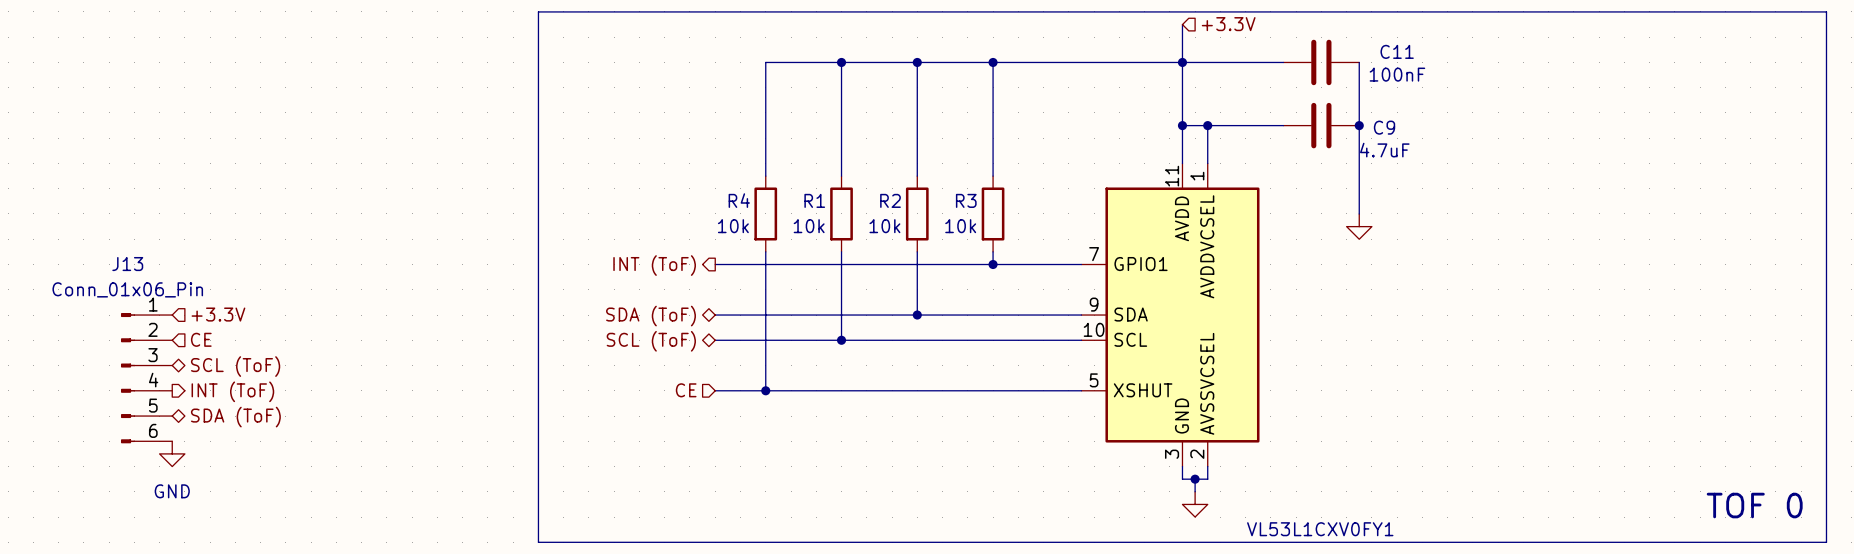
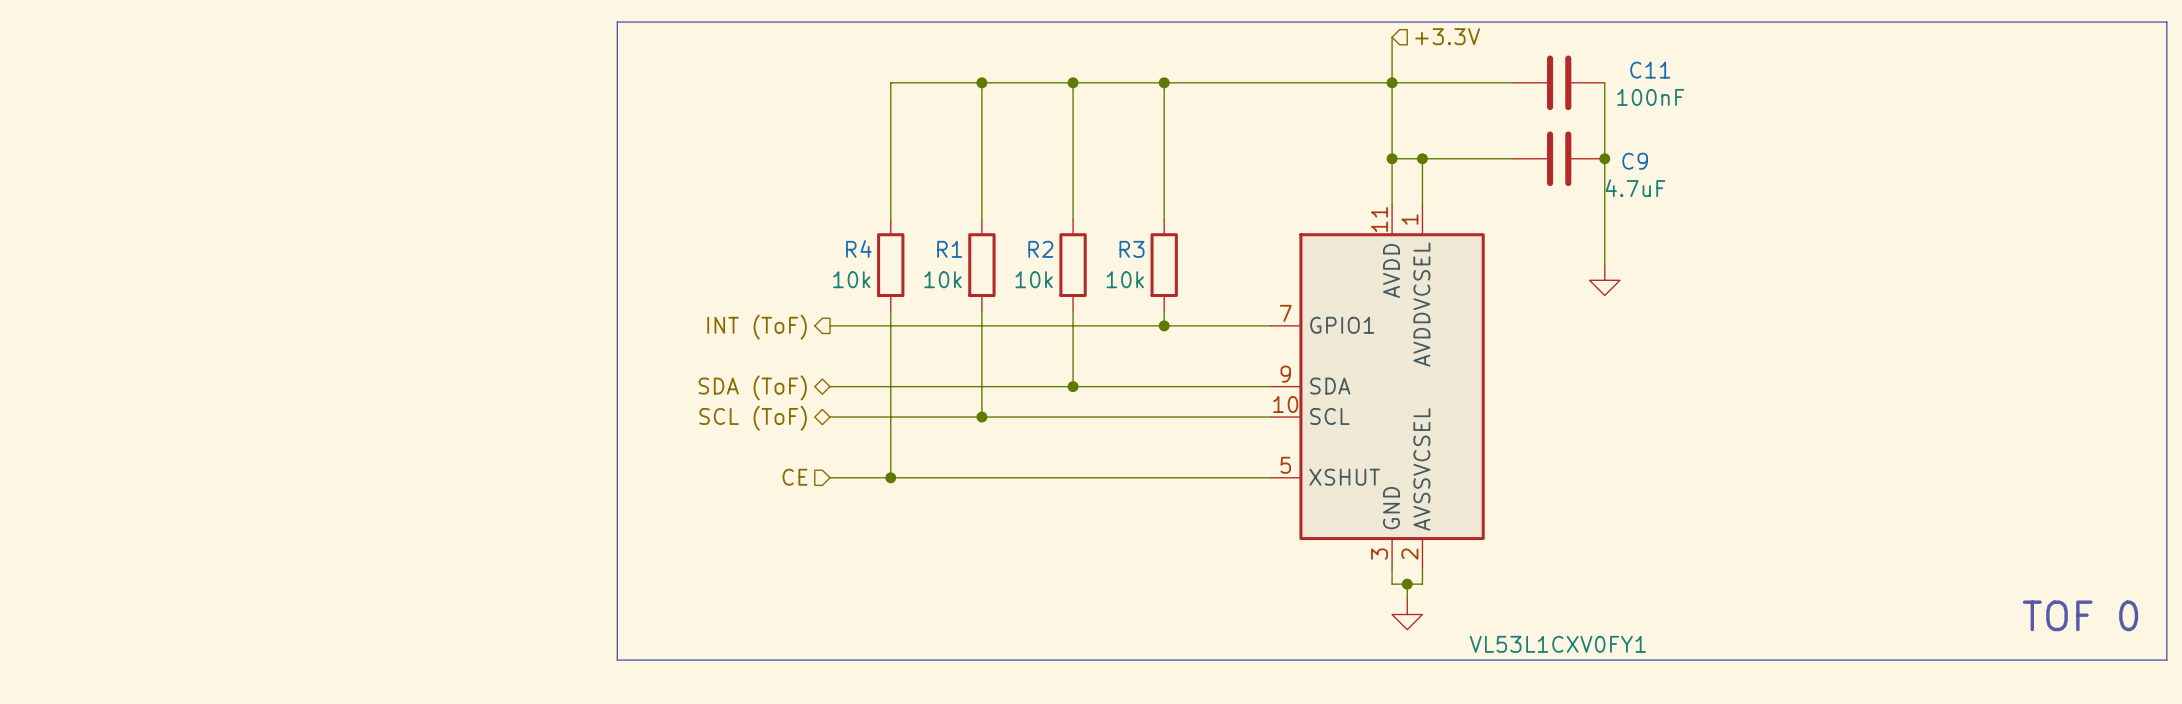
hierarchical label: +3.3V (218, 314) -> none
hierarchical label: CE (201, 339) -> none
hierarchical label: SCL (ToF) (235, 366) -> none
J13: Conn_01x06_Pin (146, 378) -> none
hierarchical label: INT (ToF) (232, 391) -> none
hierarchical label: SDA (ToF) (235, 417) -> none
power symbol: GND (172, 453) -> none

